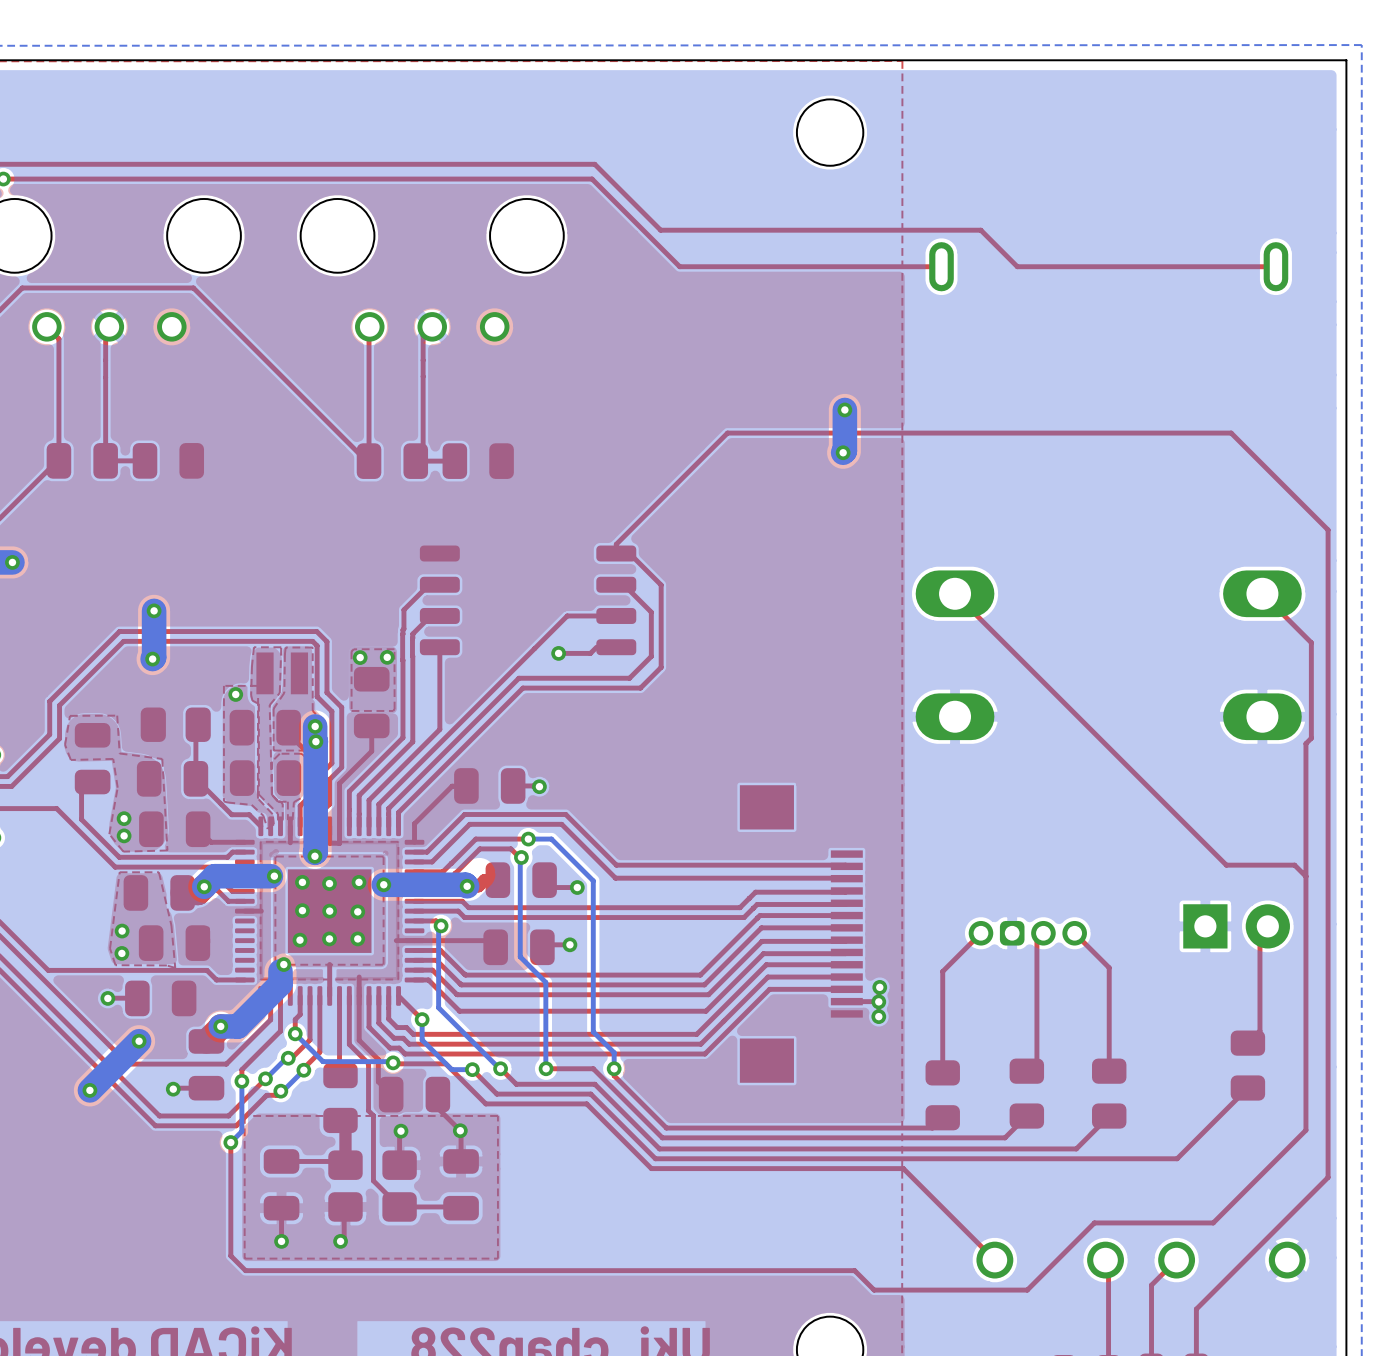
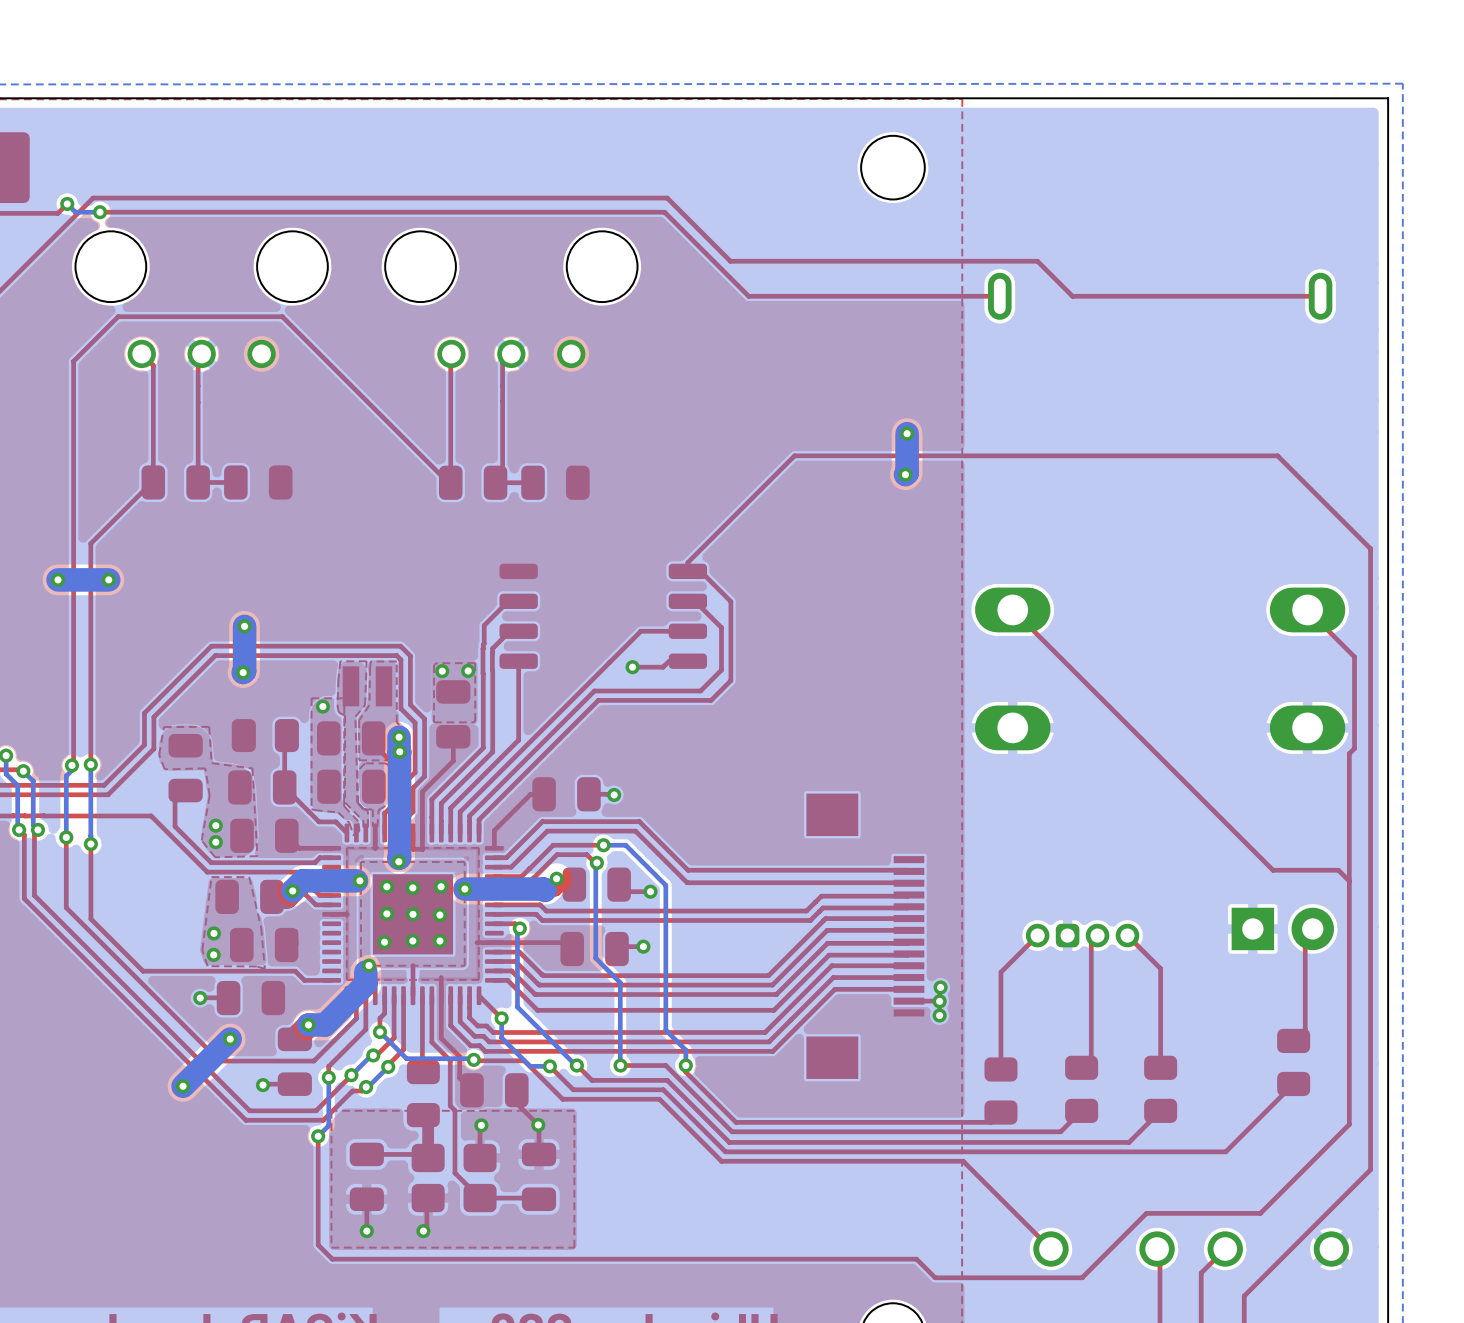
via position: (467, 886) -> (556, 878)

